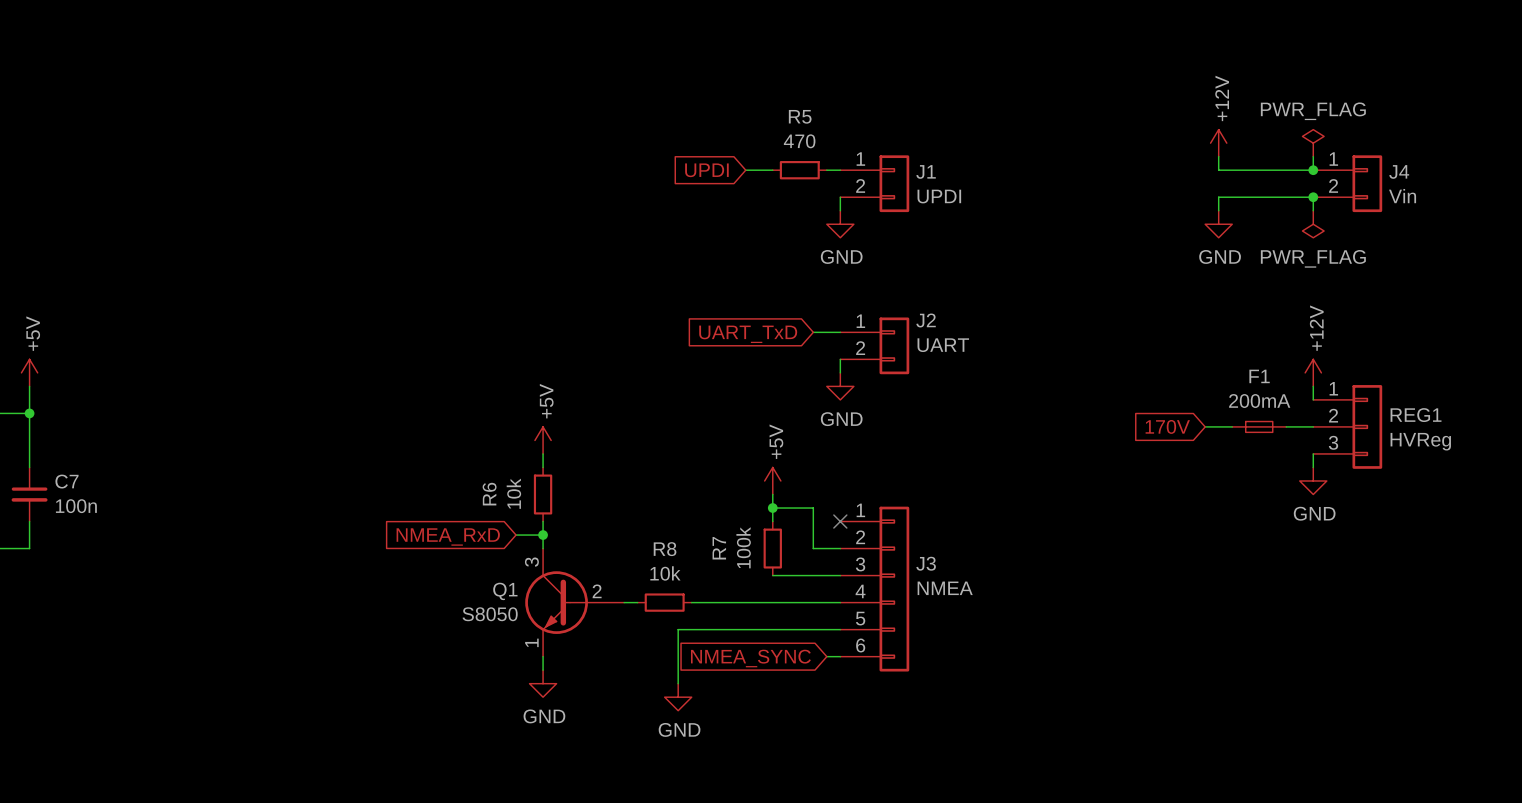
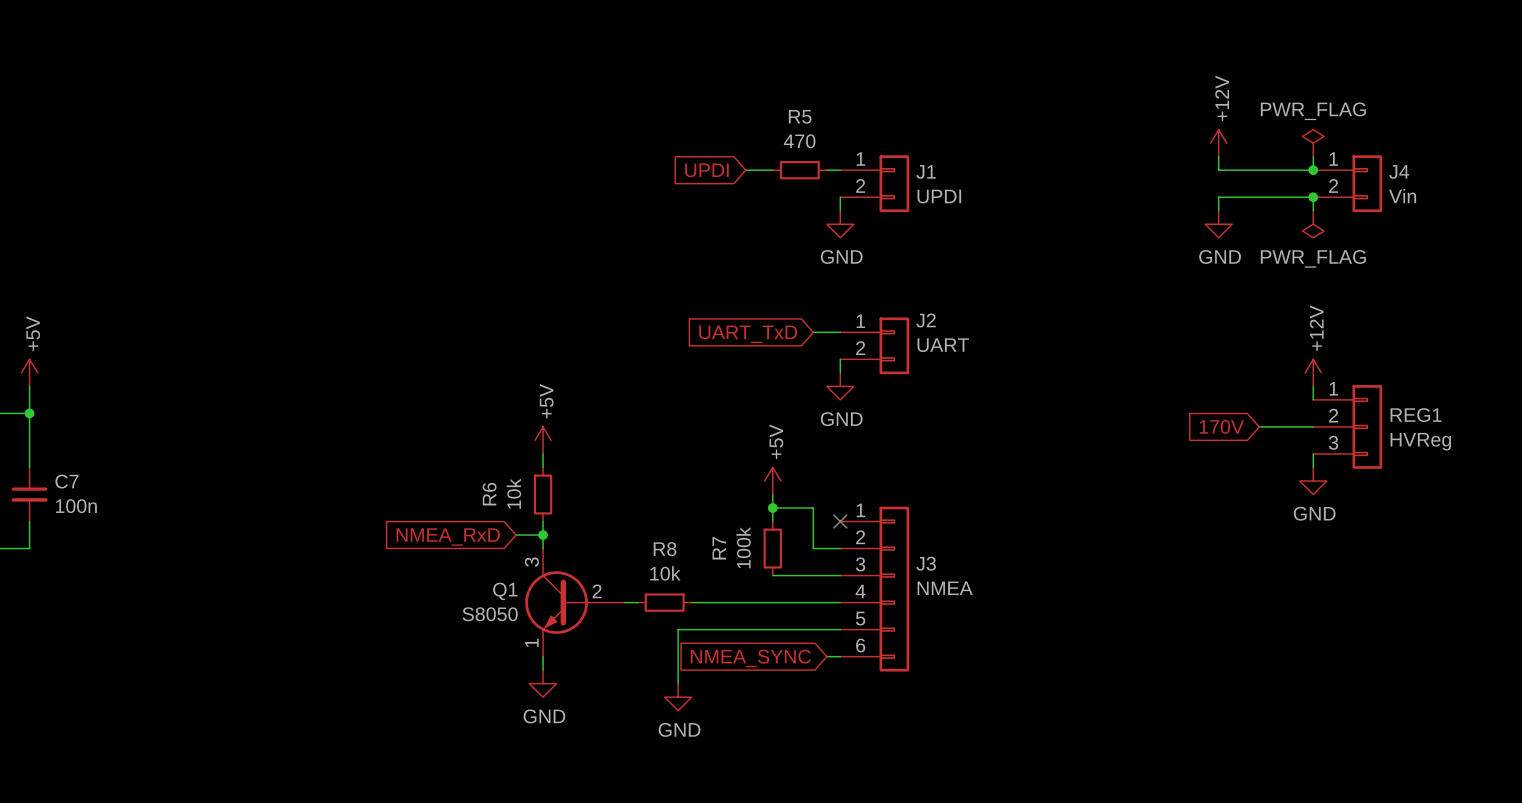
global label position: 170V (1167, 426) -> 170V (1221, 426)
F1: 200mA (1259, 426) -> none

